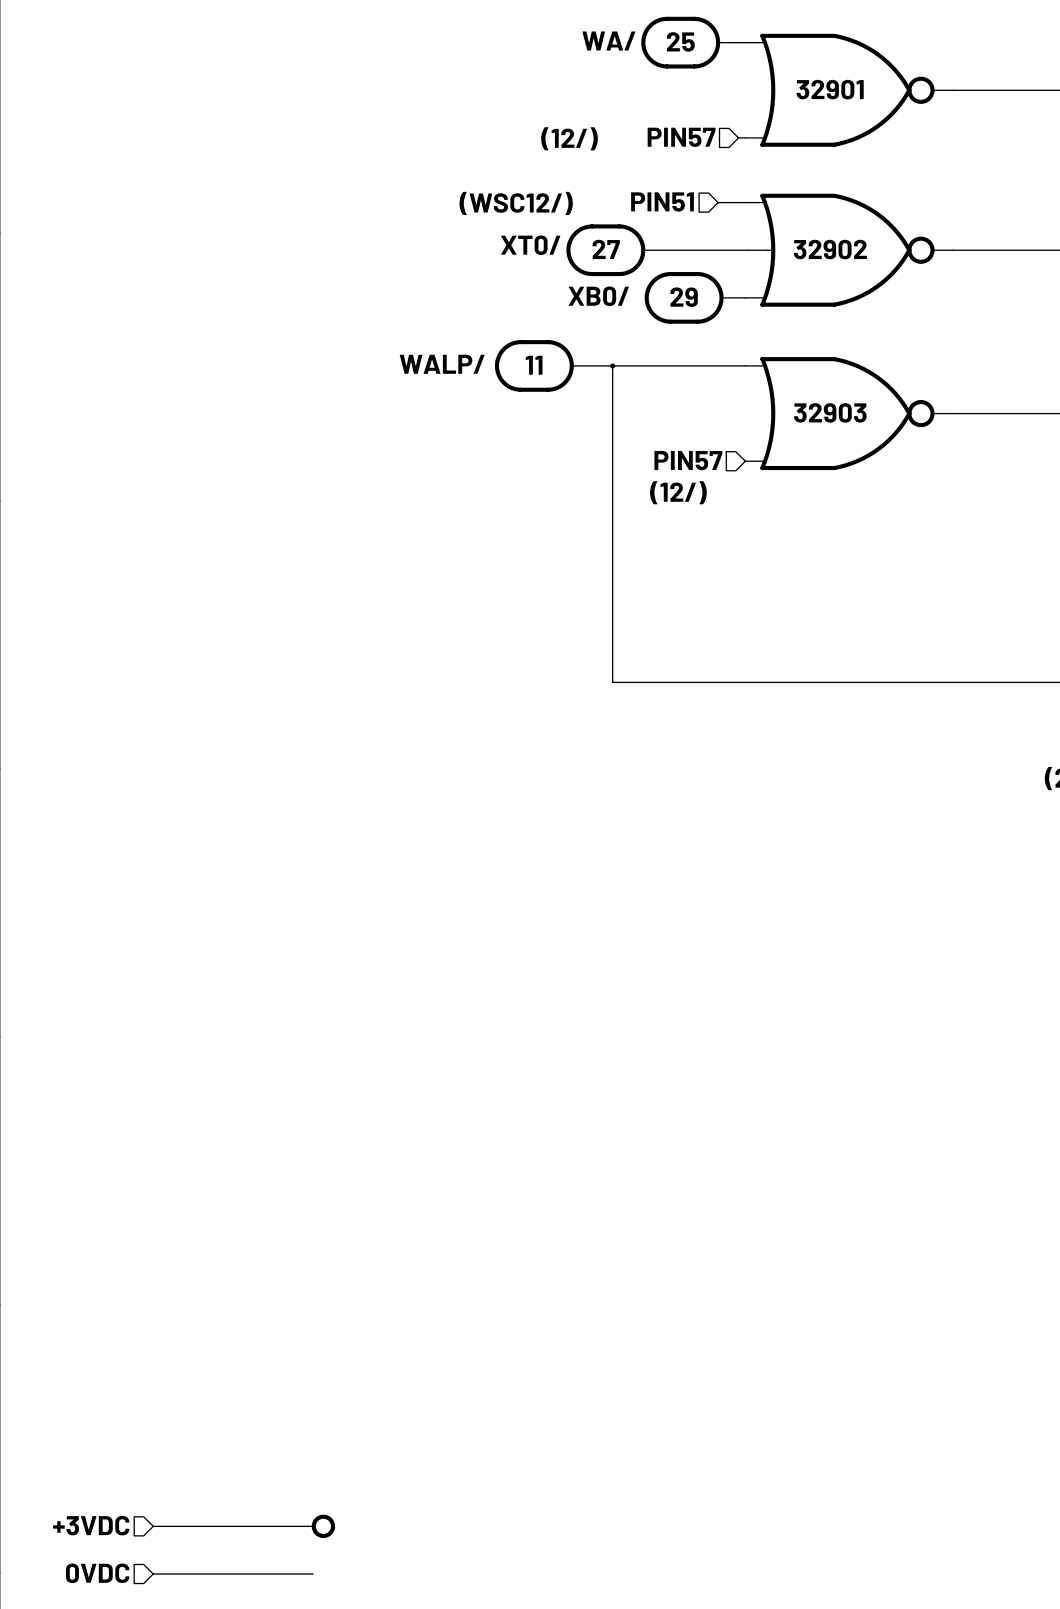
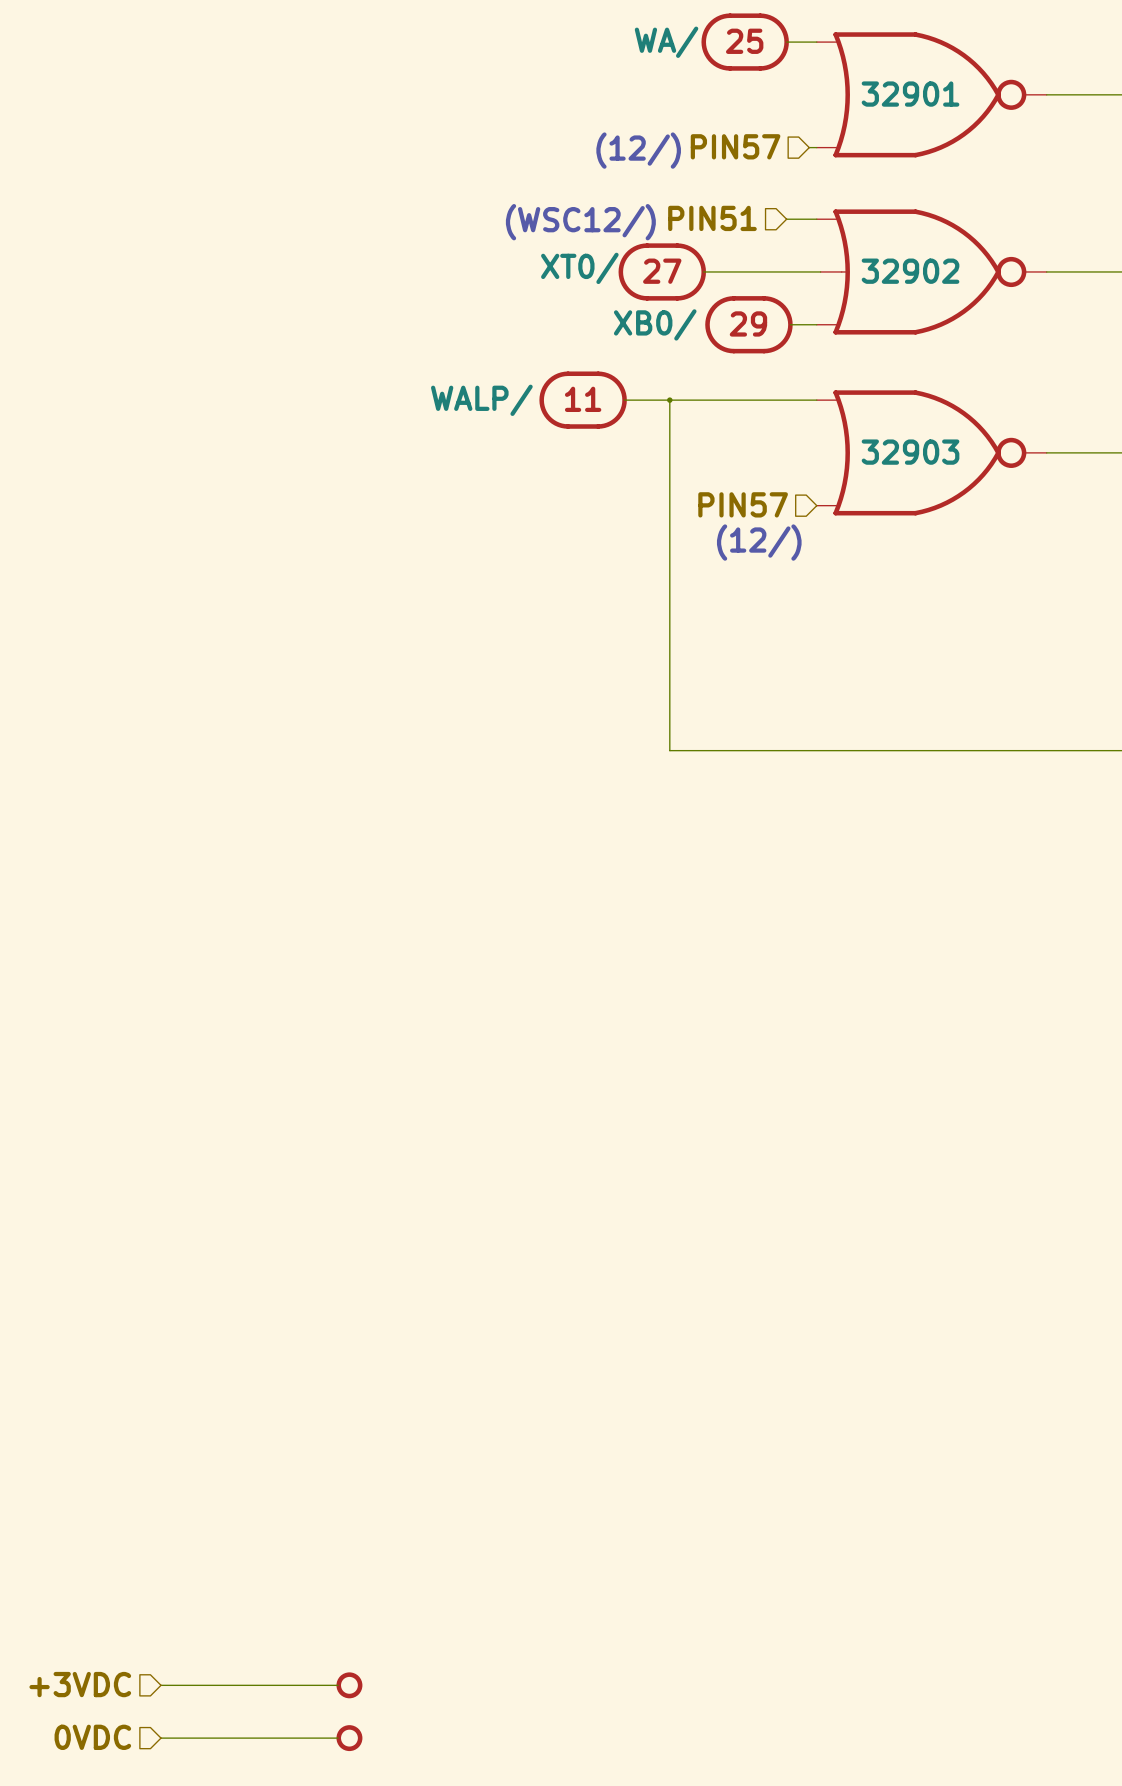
part: none -> (349, 1738)

